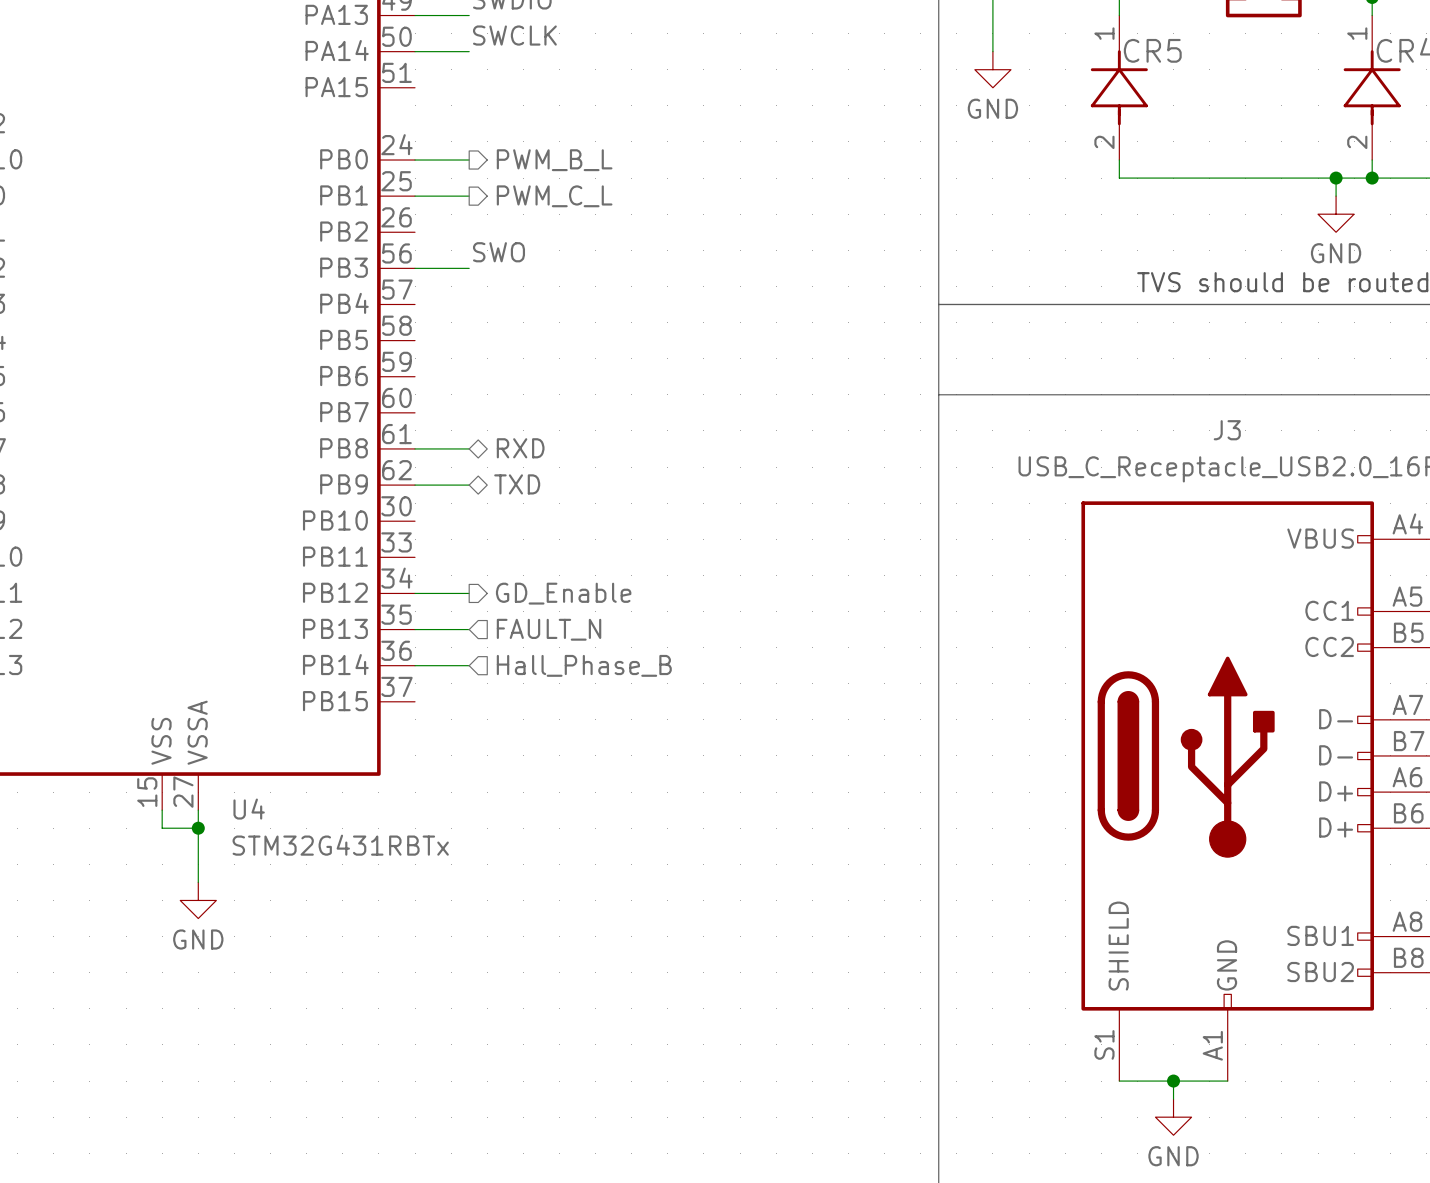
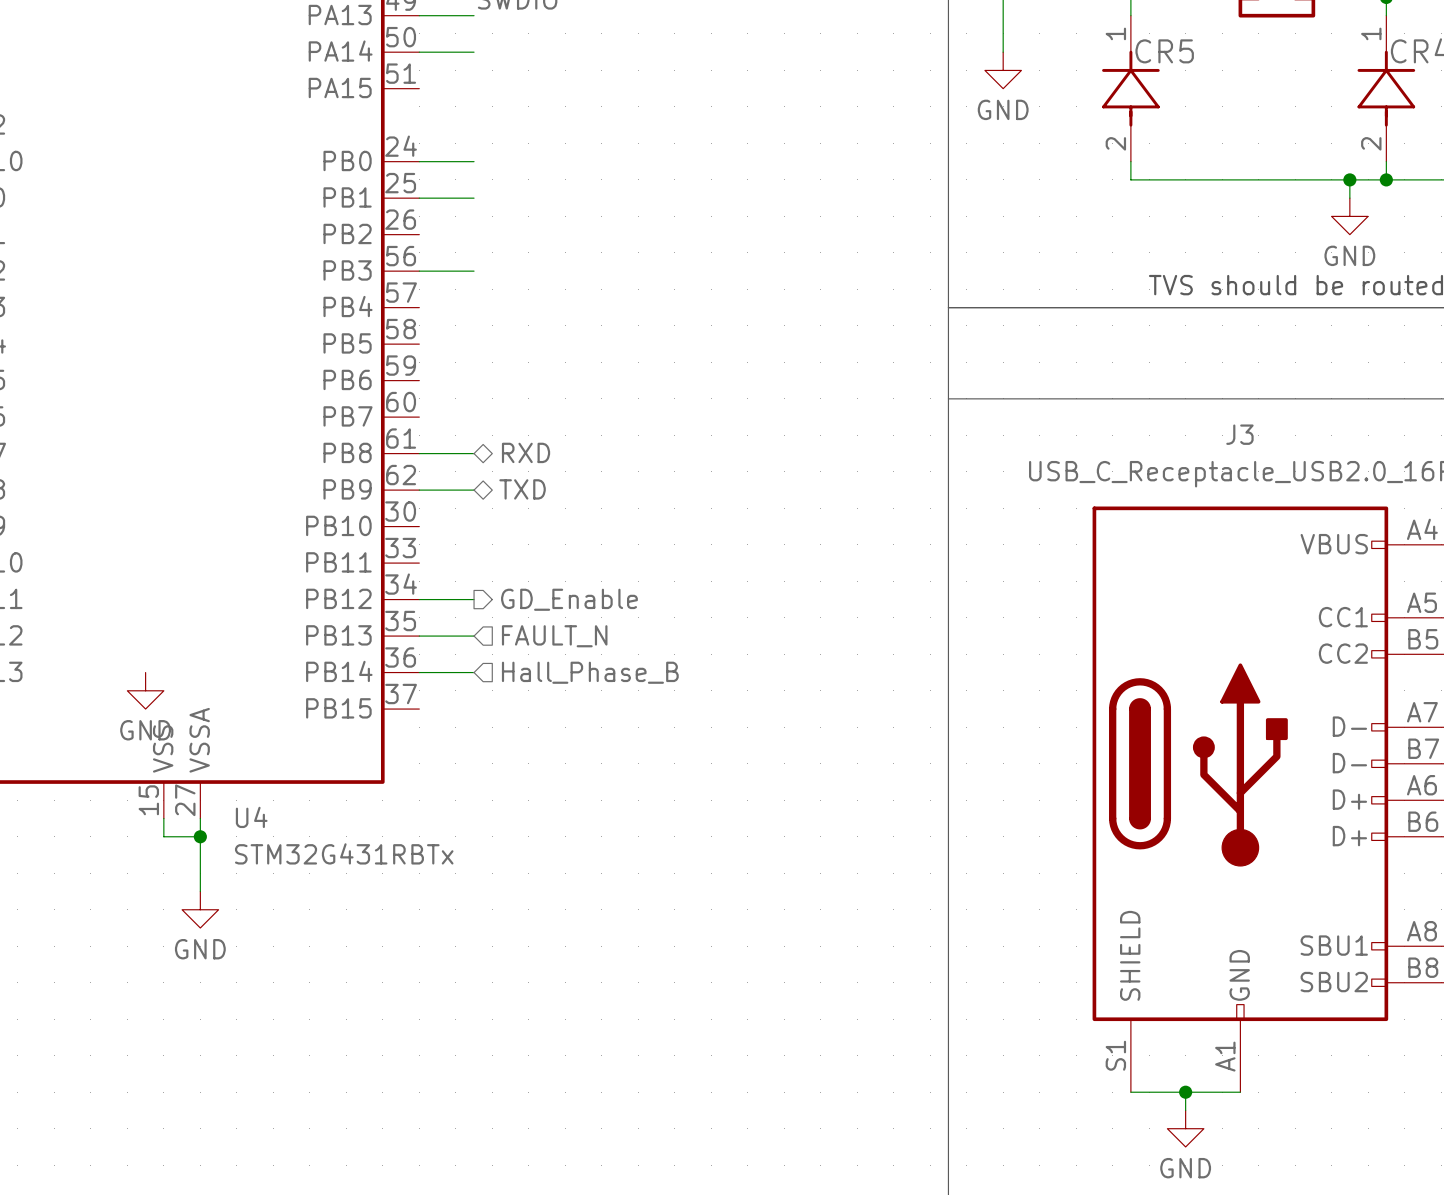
label: SWCLK (514, 35) -> none
hierarchical label: PWM_B_L (554, 160) -> none
hierarchical label: PWM_C_L (554, 196) -> none
label: SWO (499, 252) -> none
power symbol: none -> GND (145, 690)

